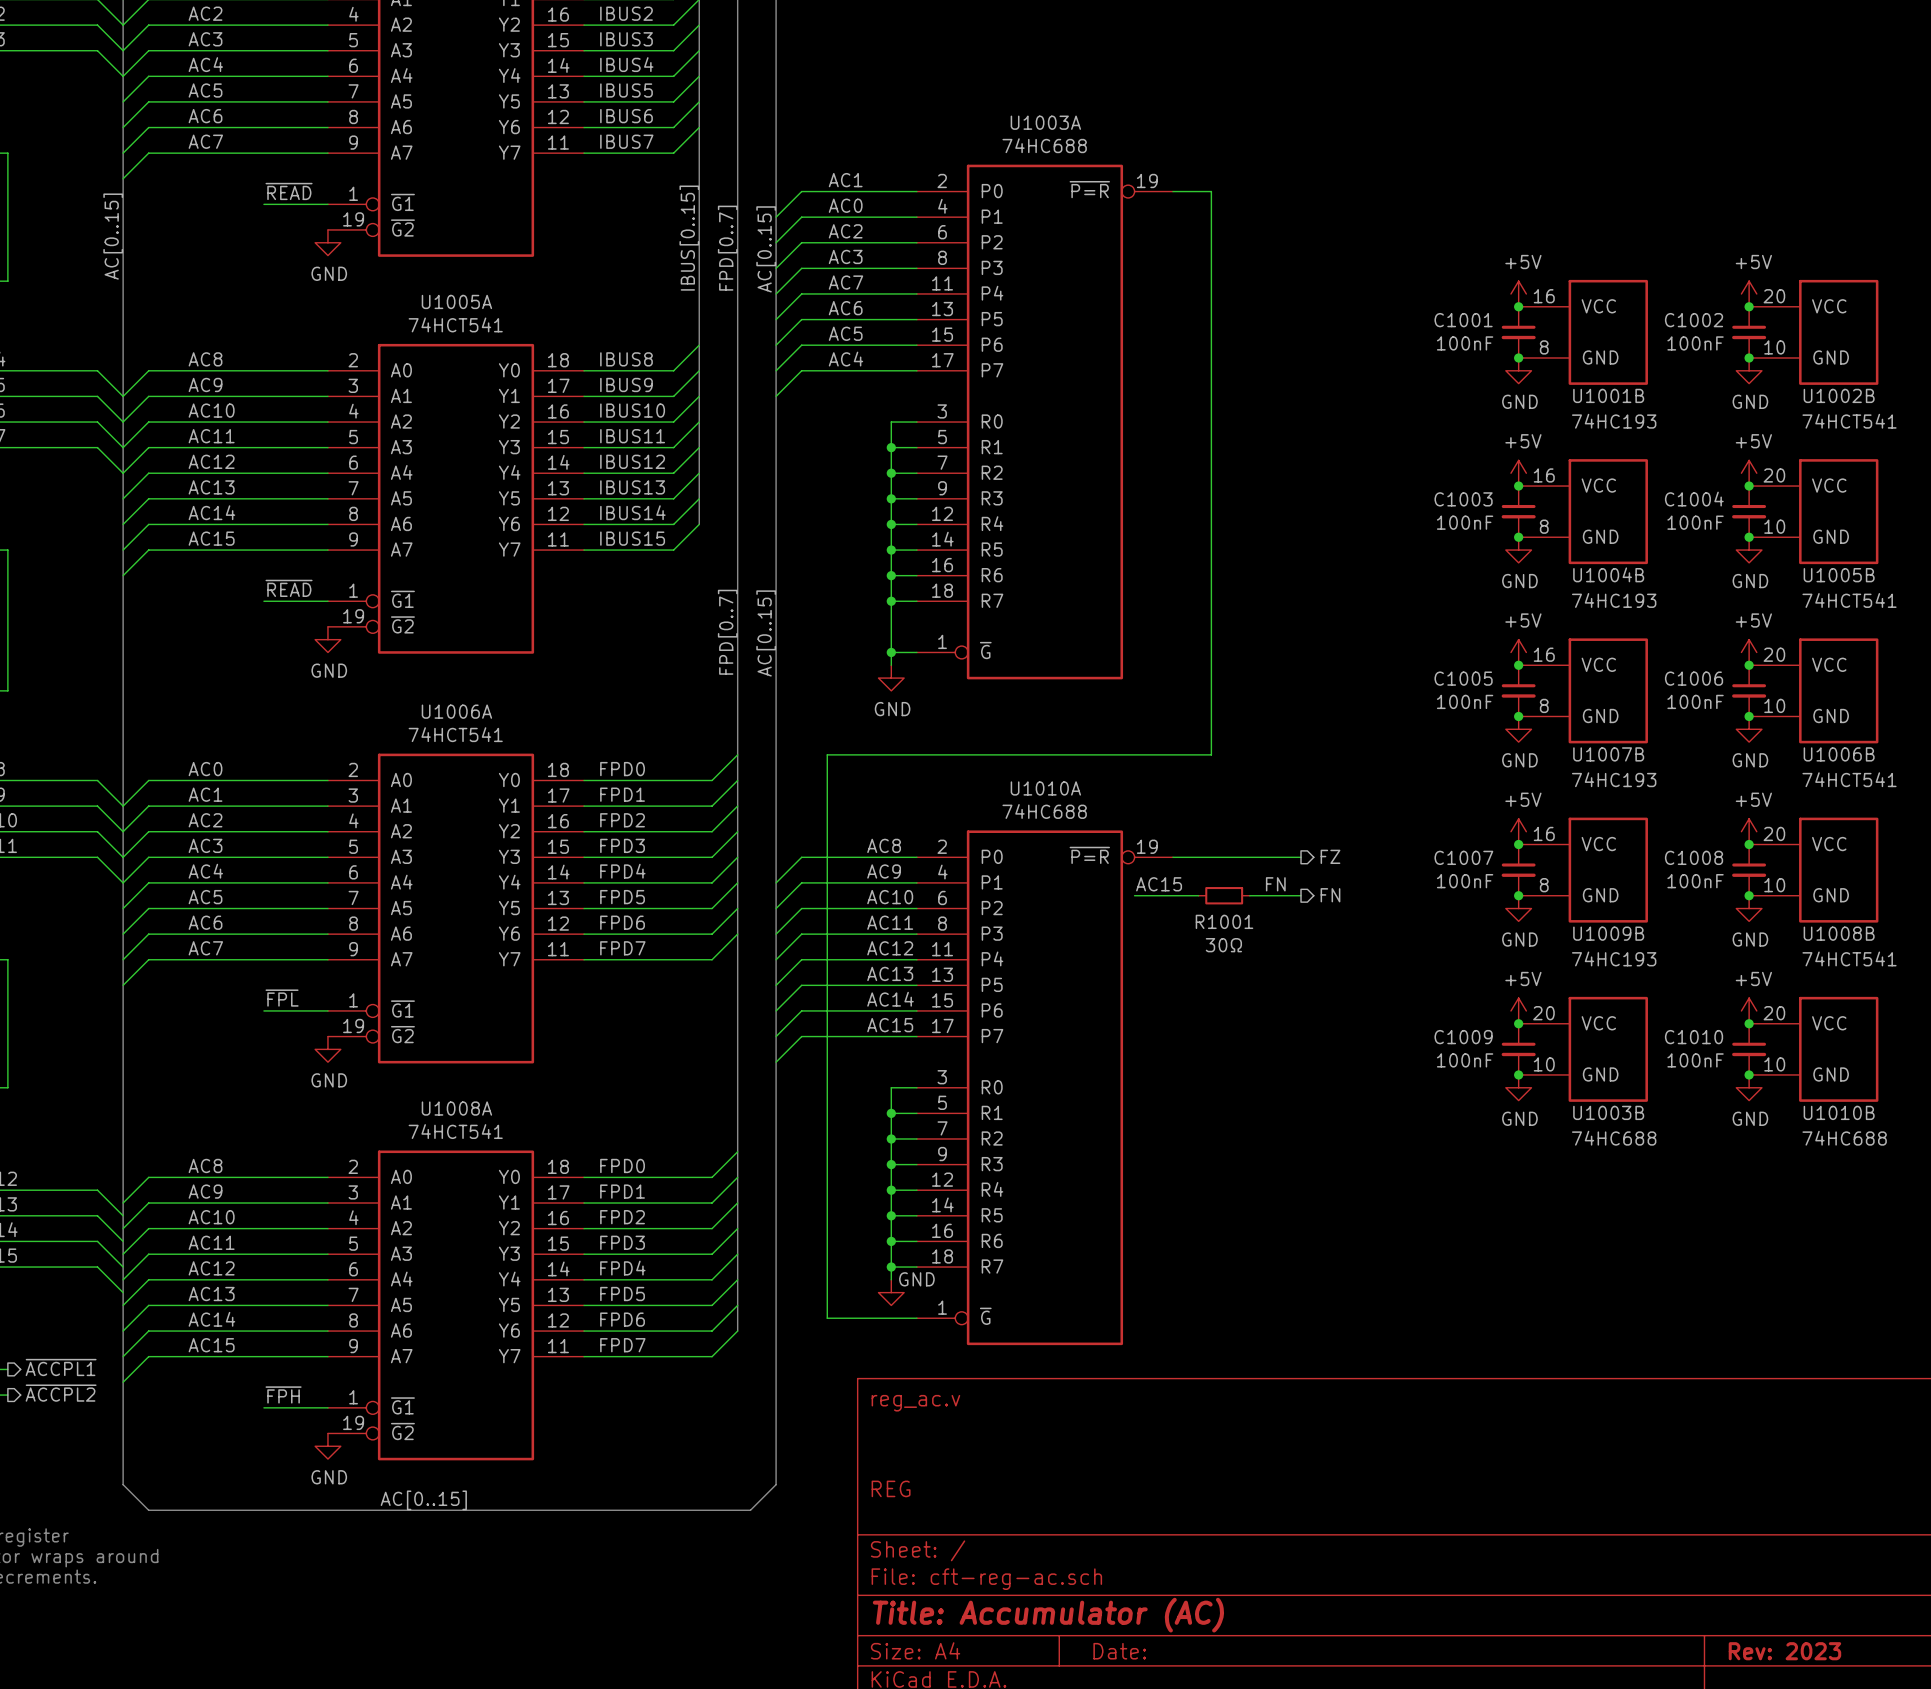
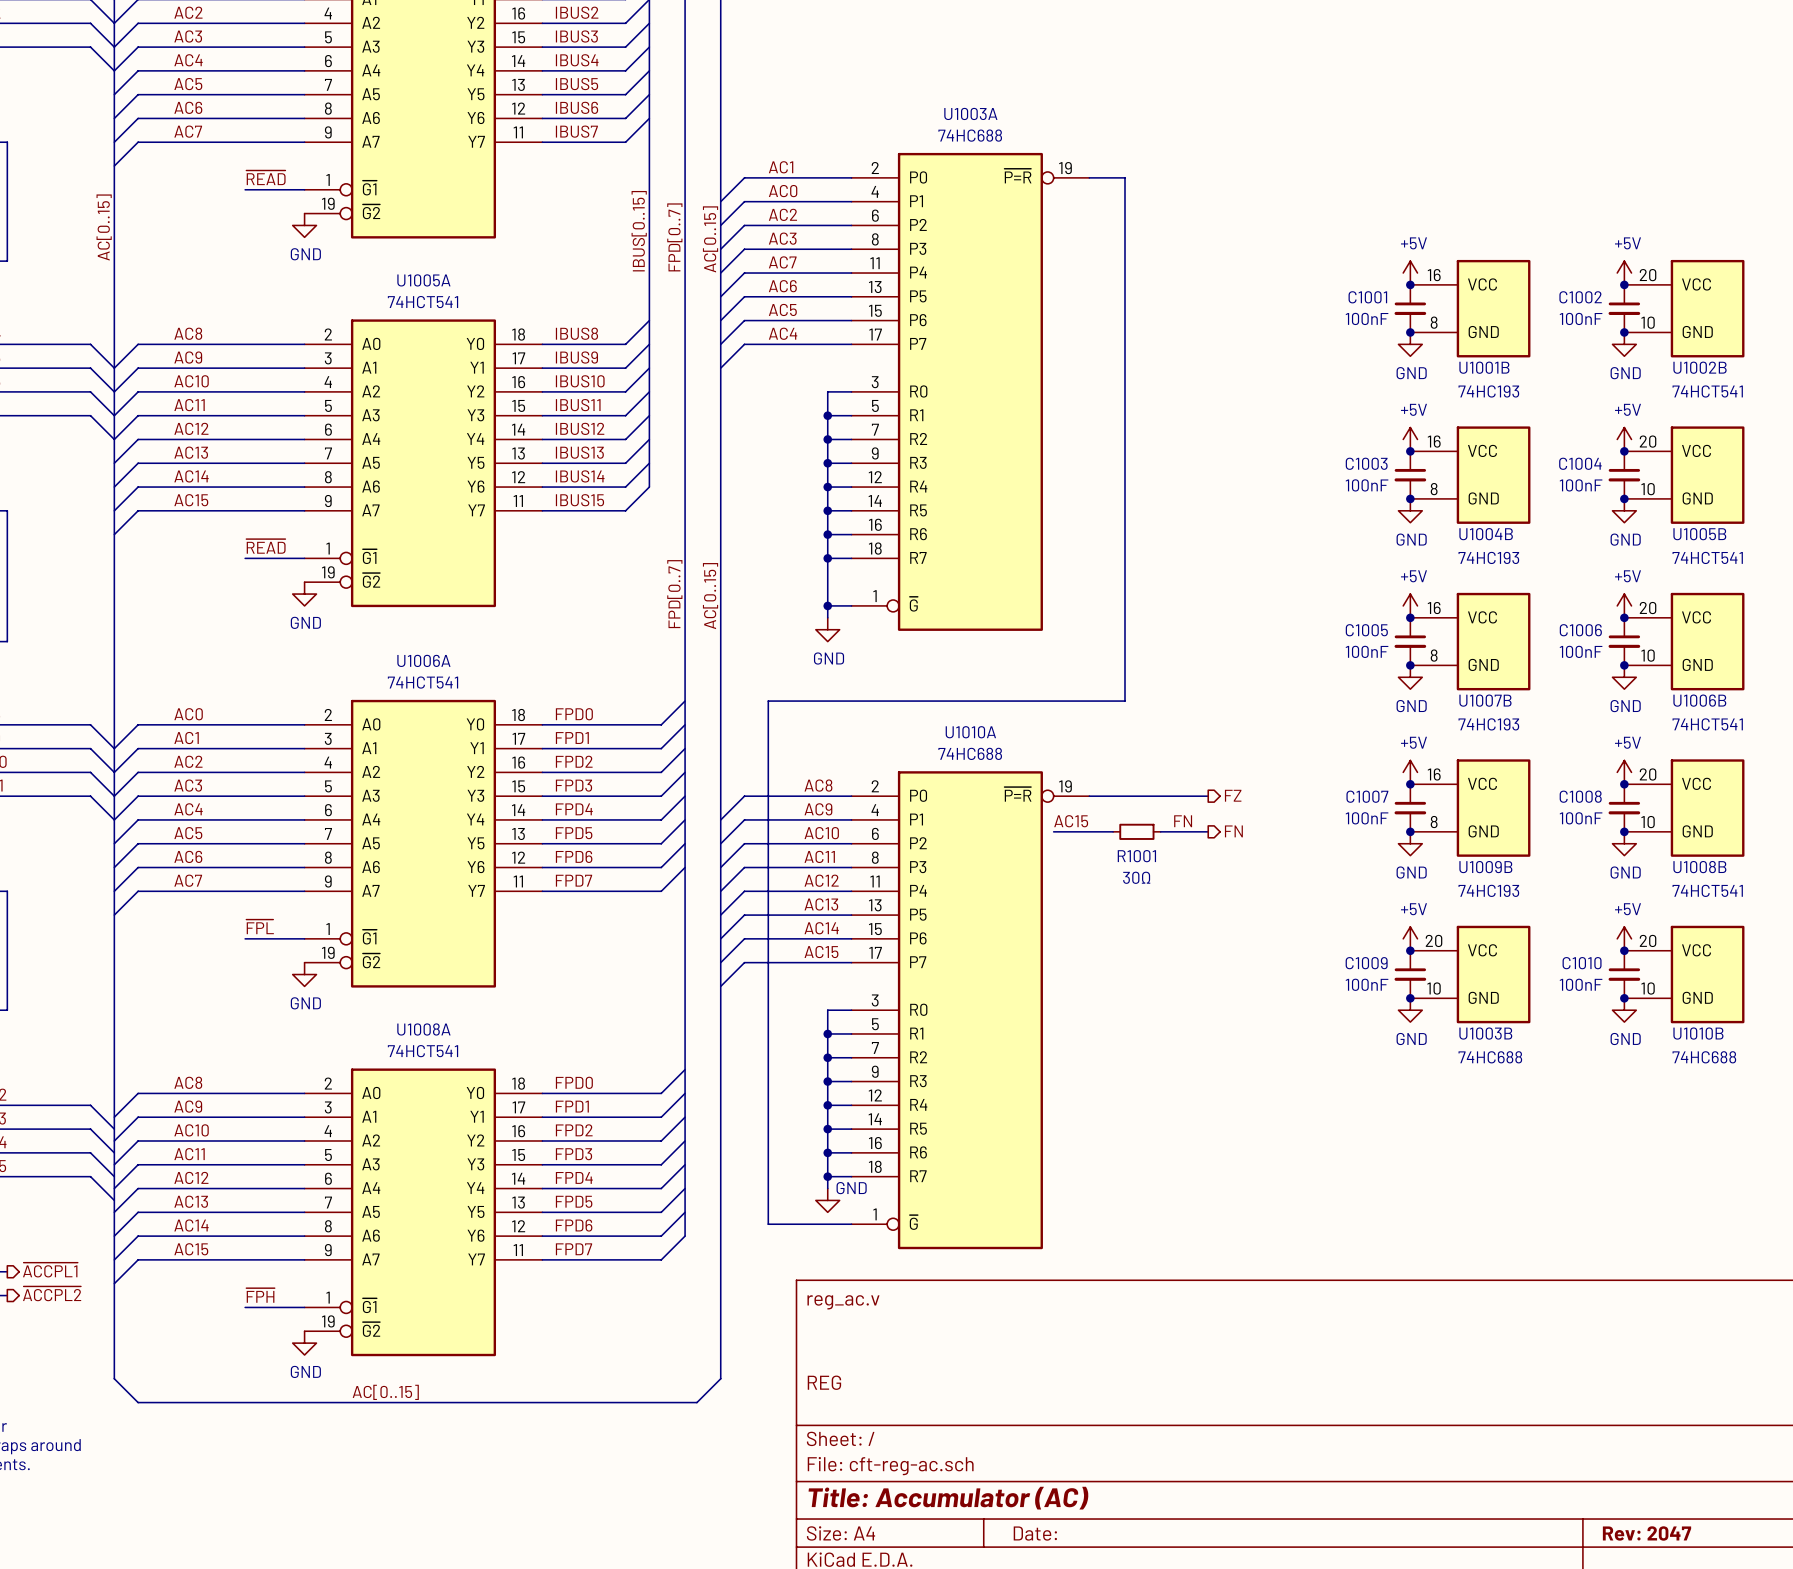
title block: Rev: 2023 (1784, 1651) -> Rev: 2047 (1647, 1533)

